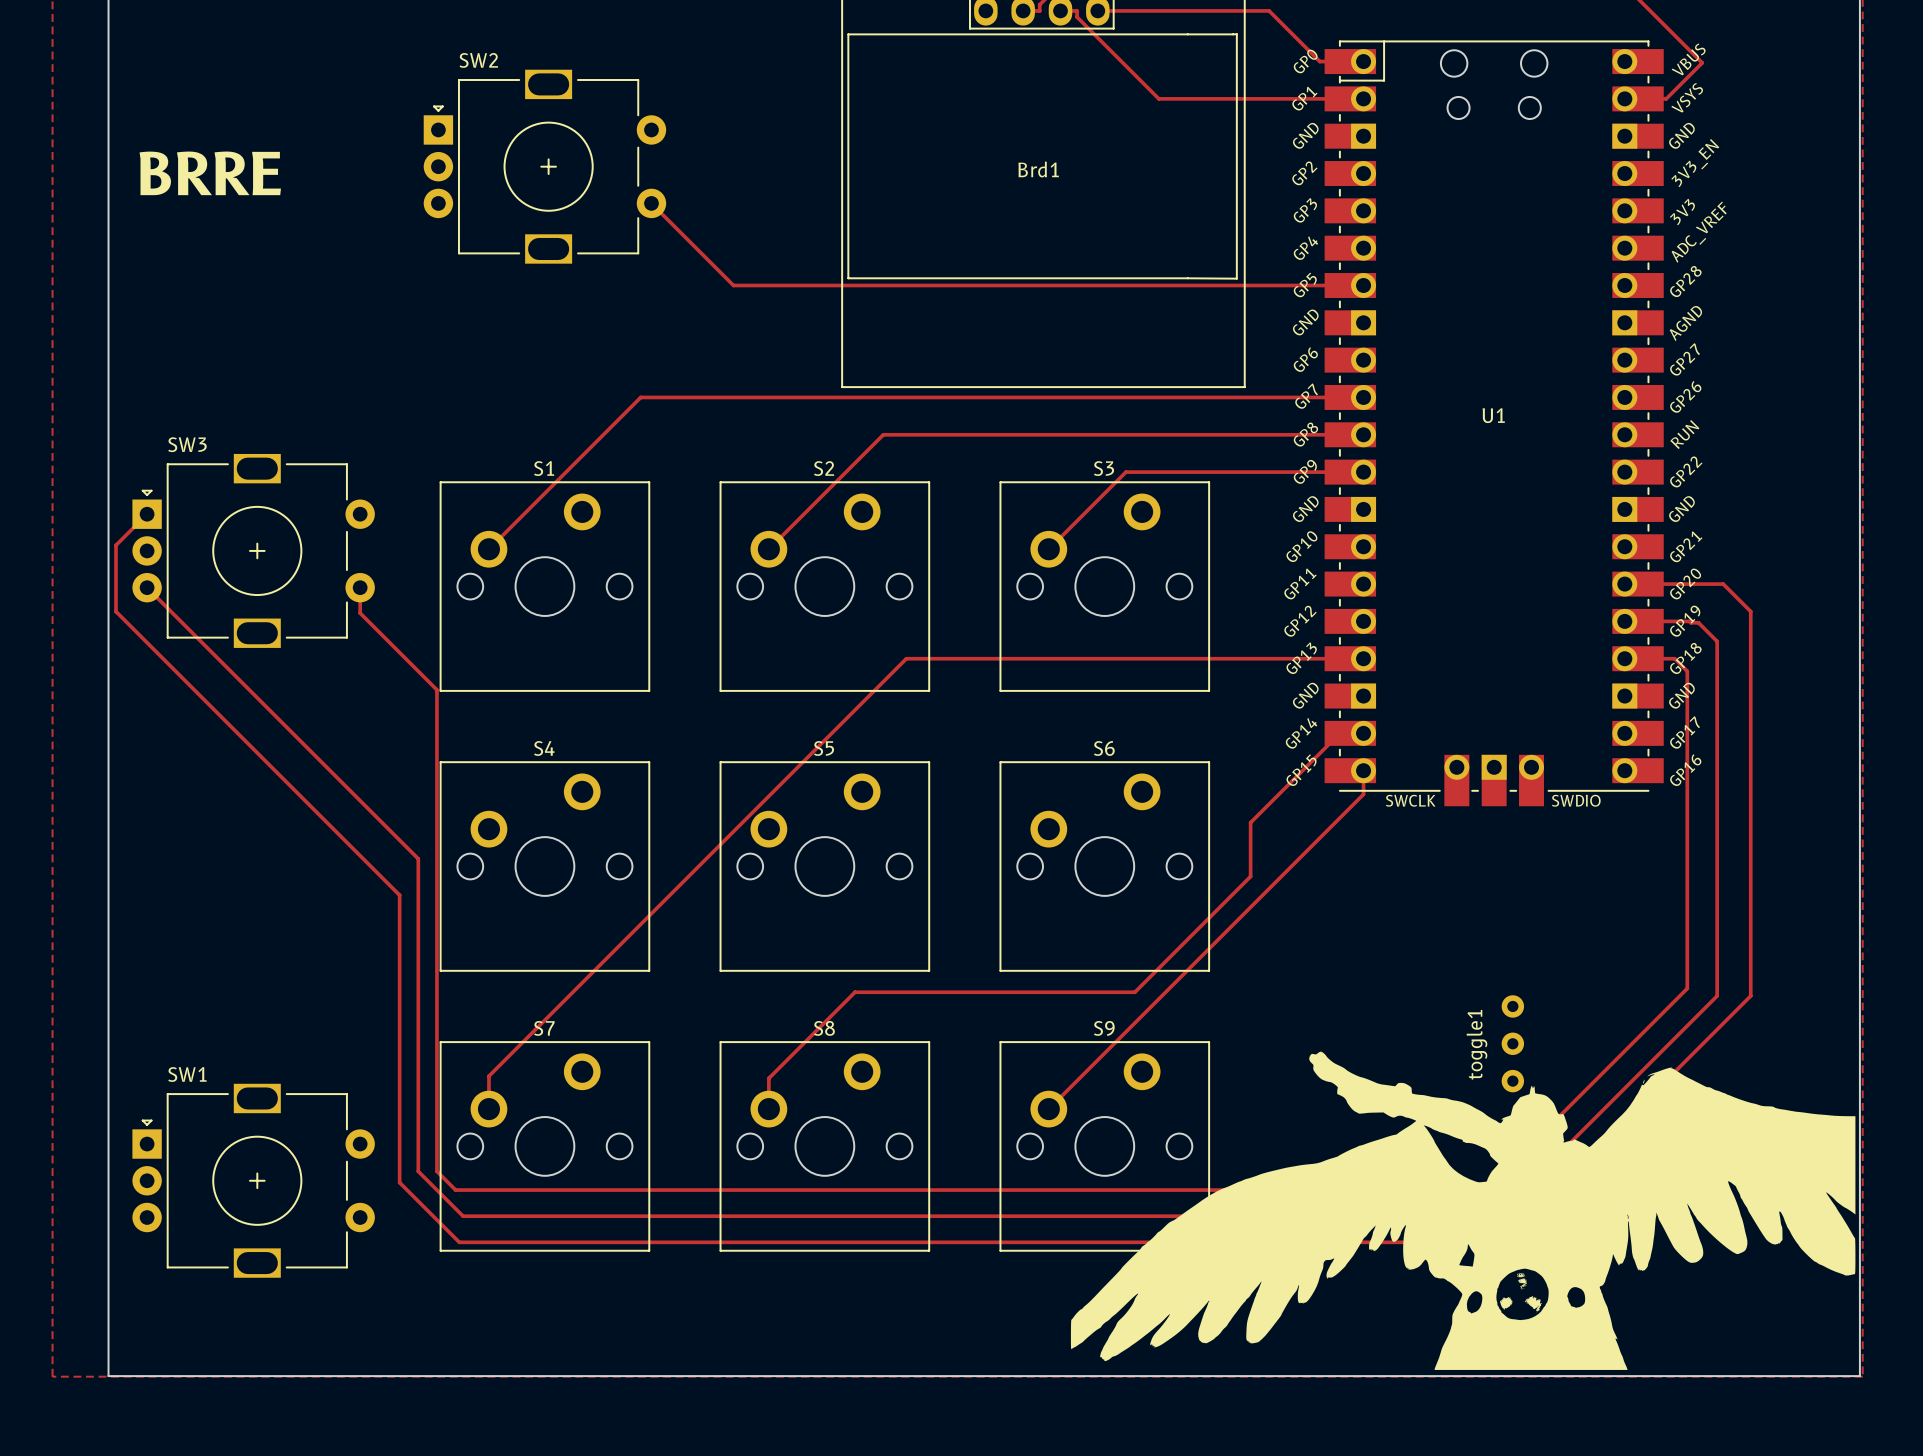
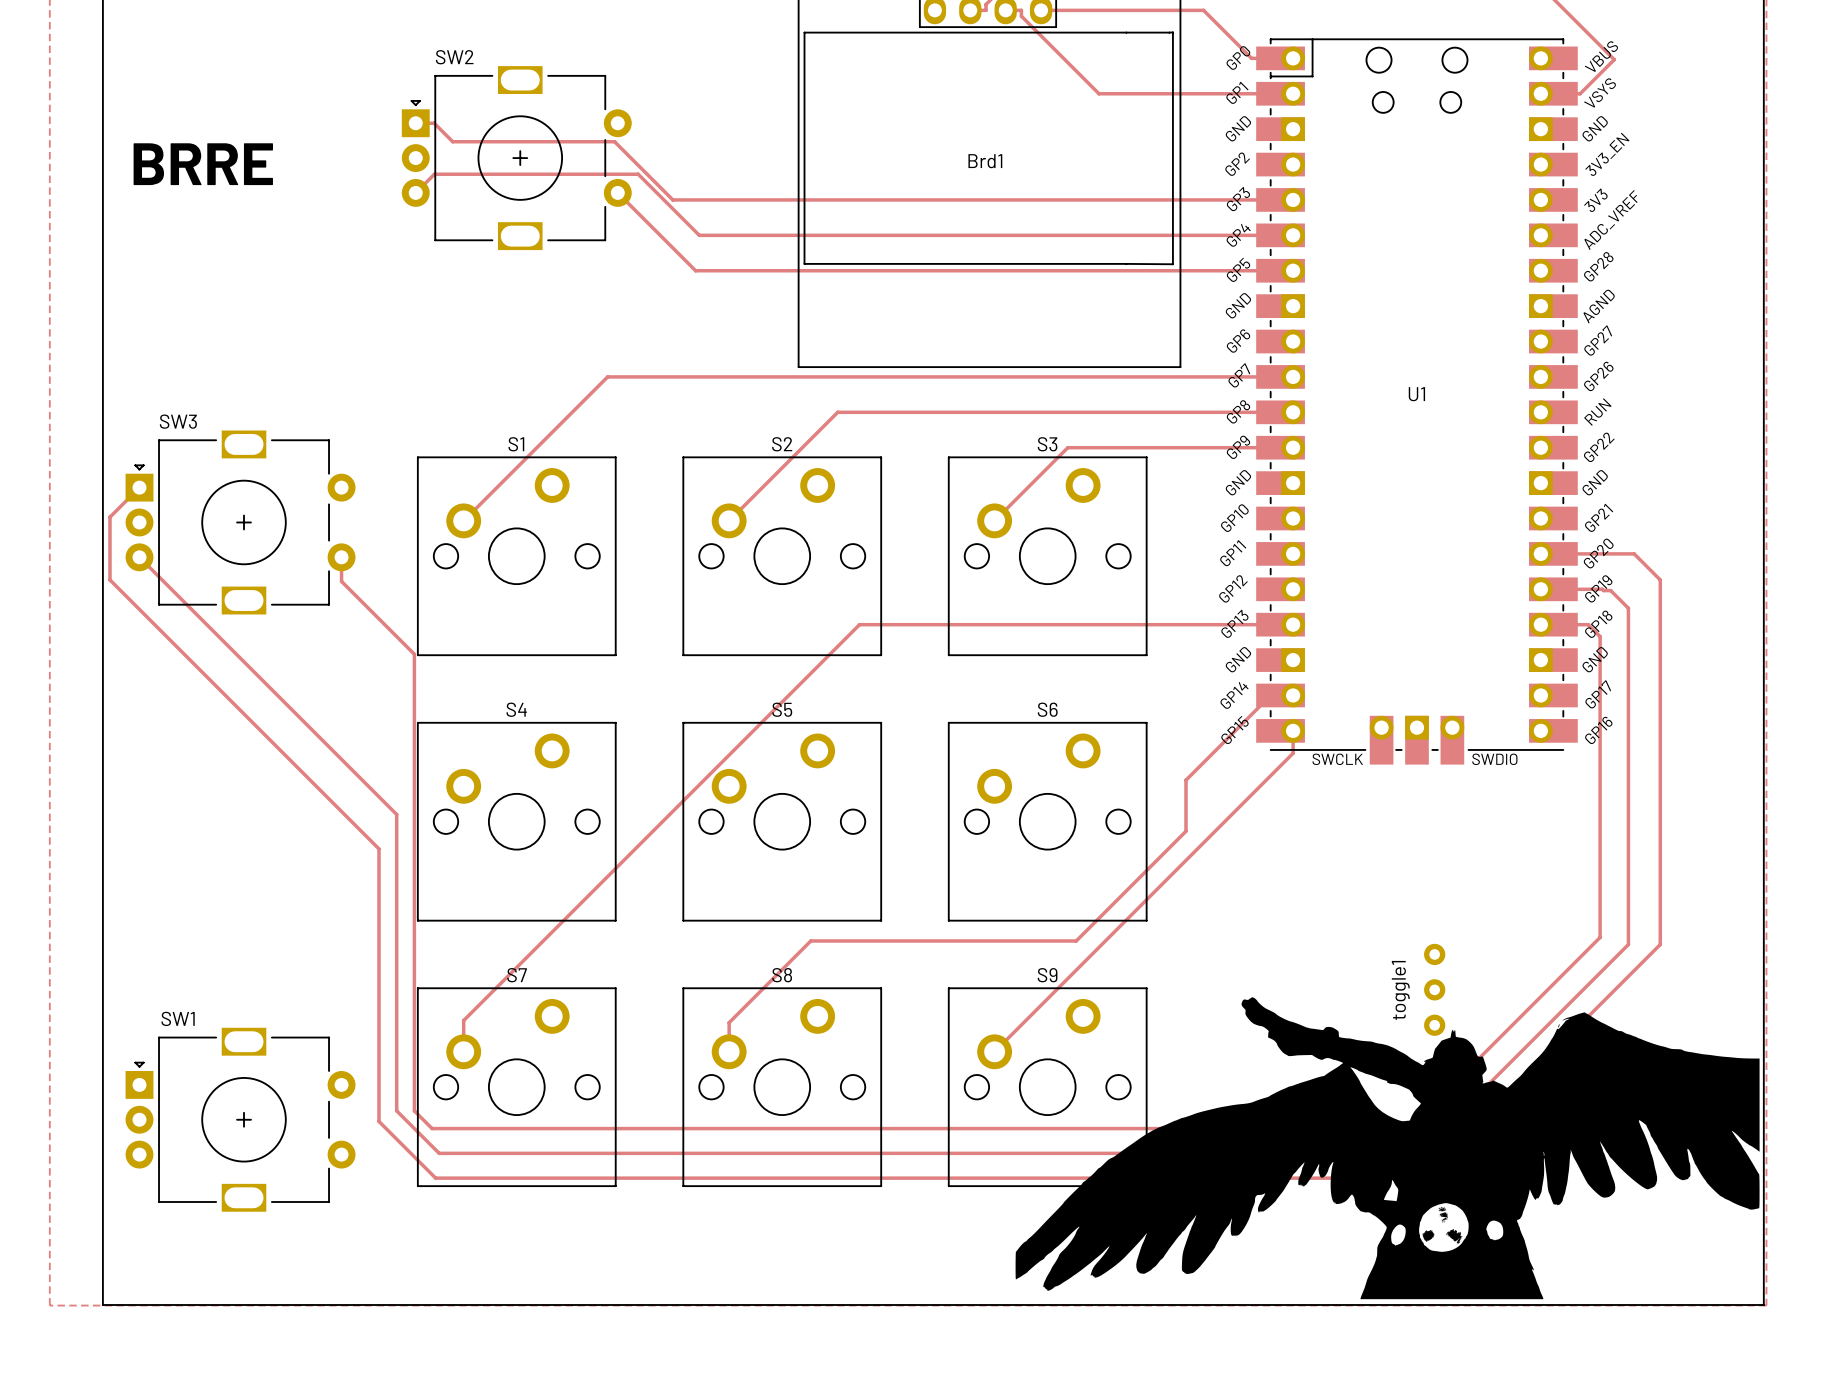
track: none -> (415, 123) (434, 123) (452, 141) (614, 141) (672, 199) (1293, 199)
track: none -> (415, 192) (434, 174) (638, 174) (699, 235) (1293, 235)

